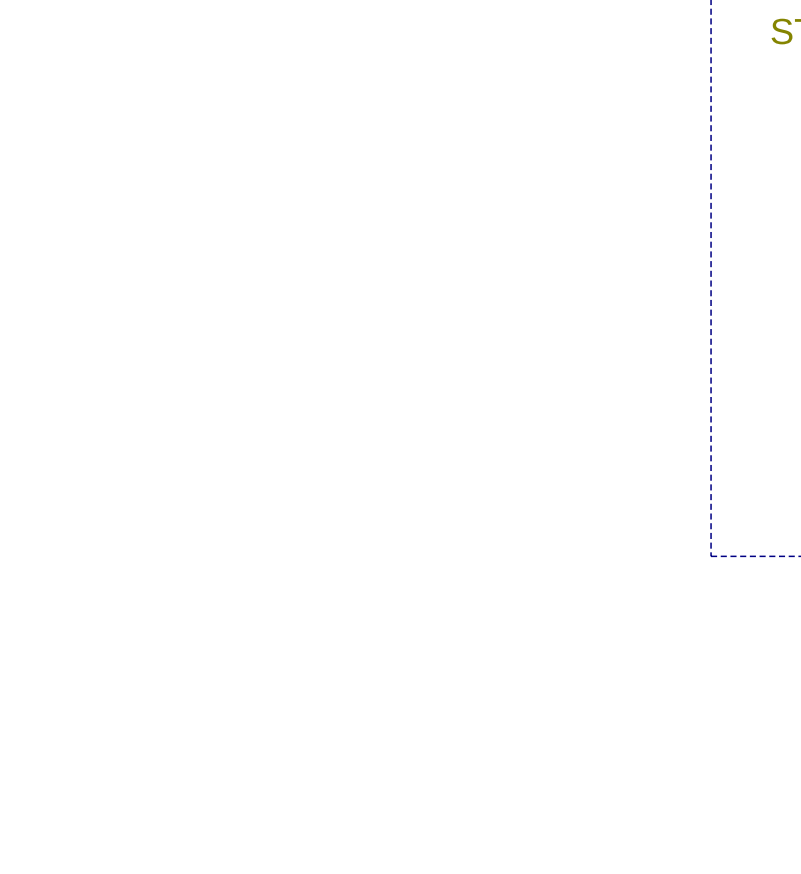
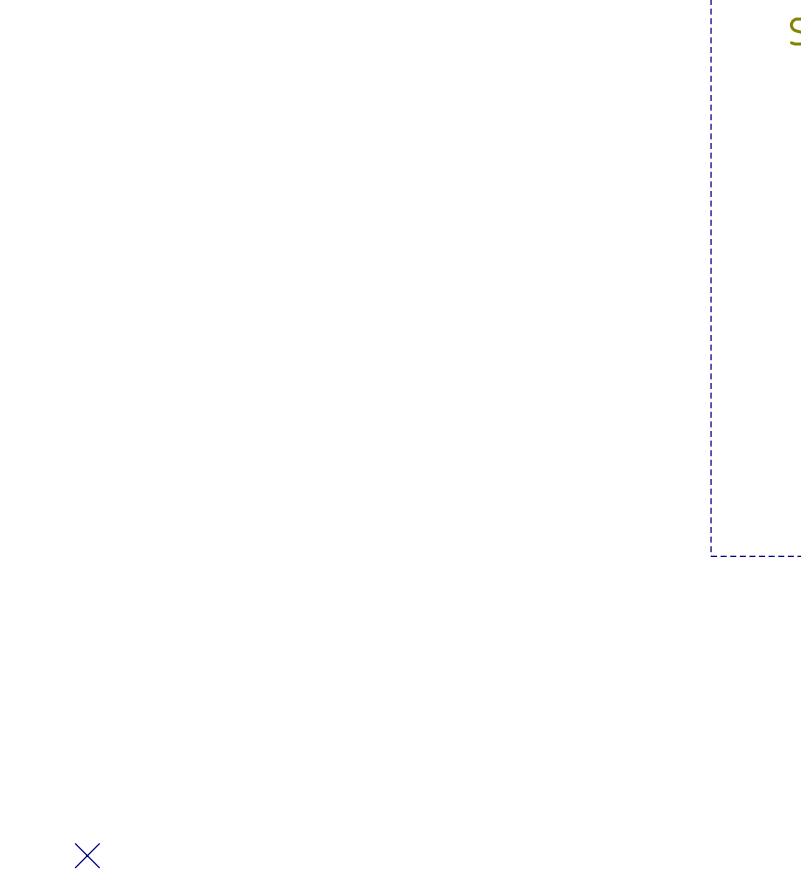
no-connect mark: none -> (87, 855)

